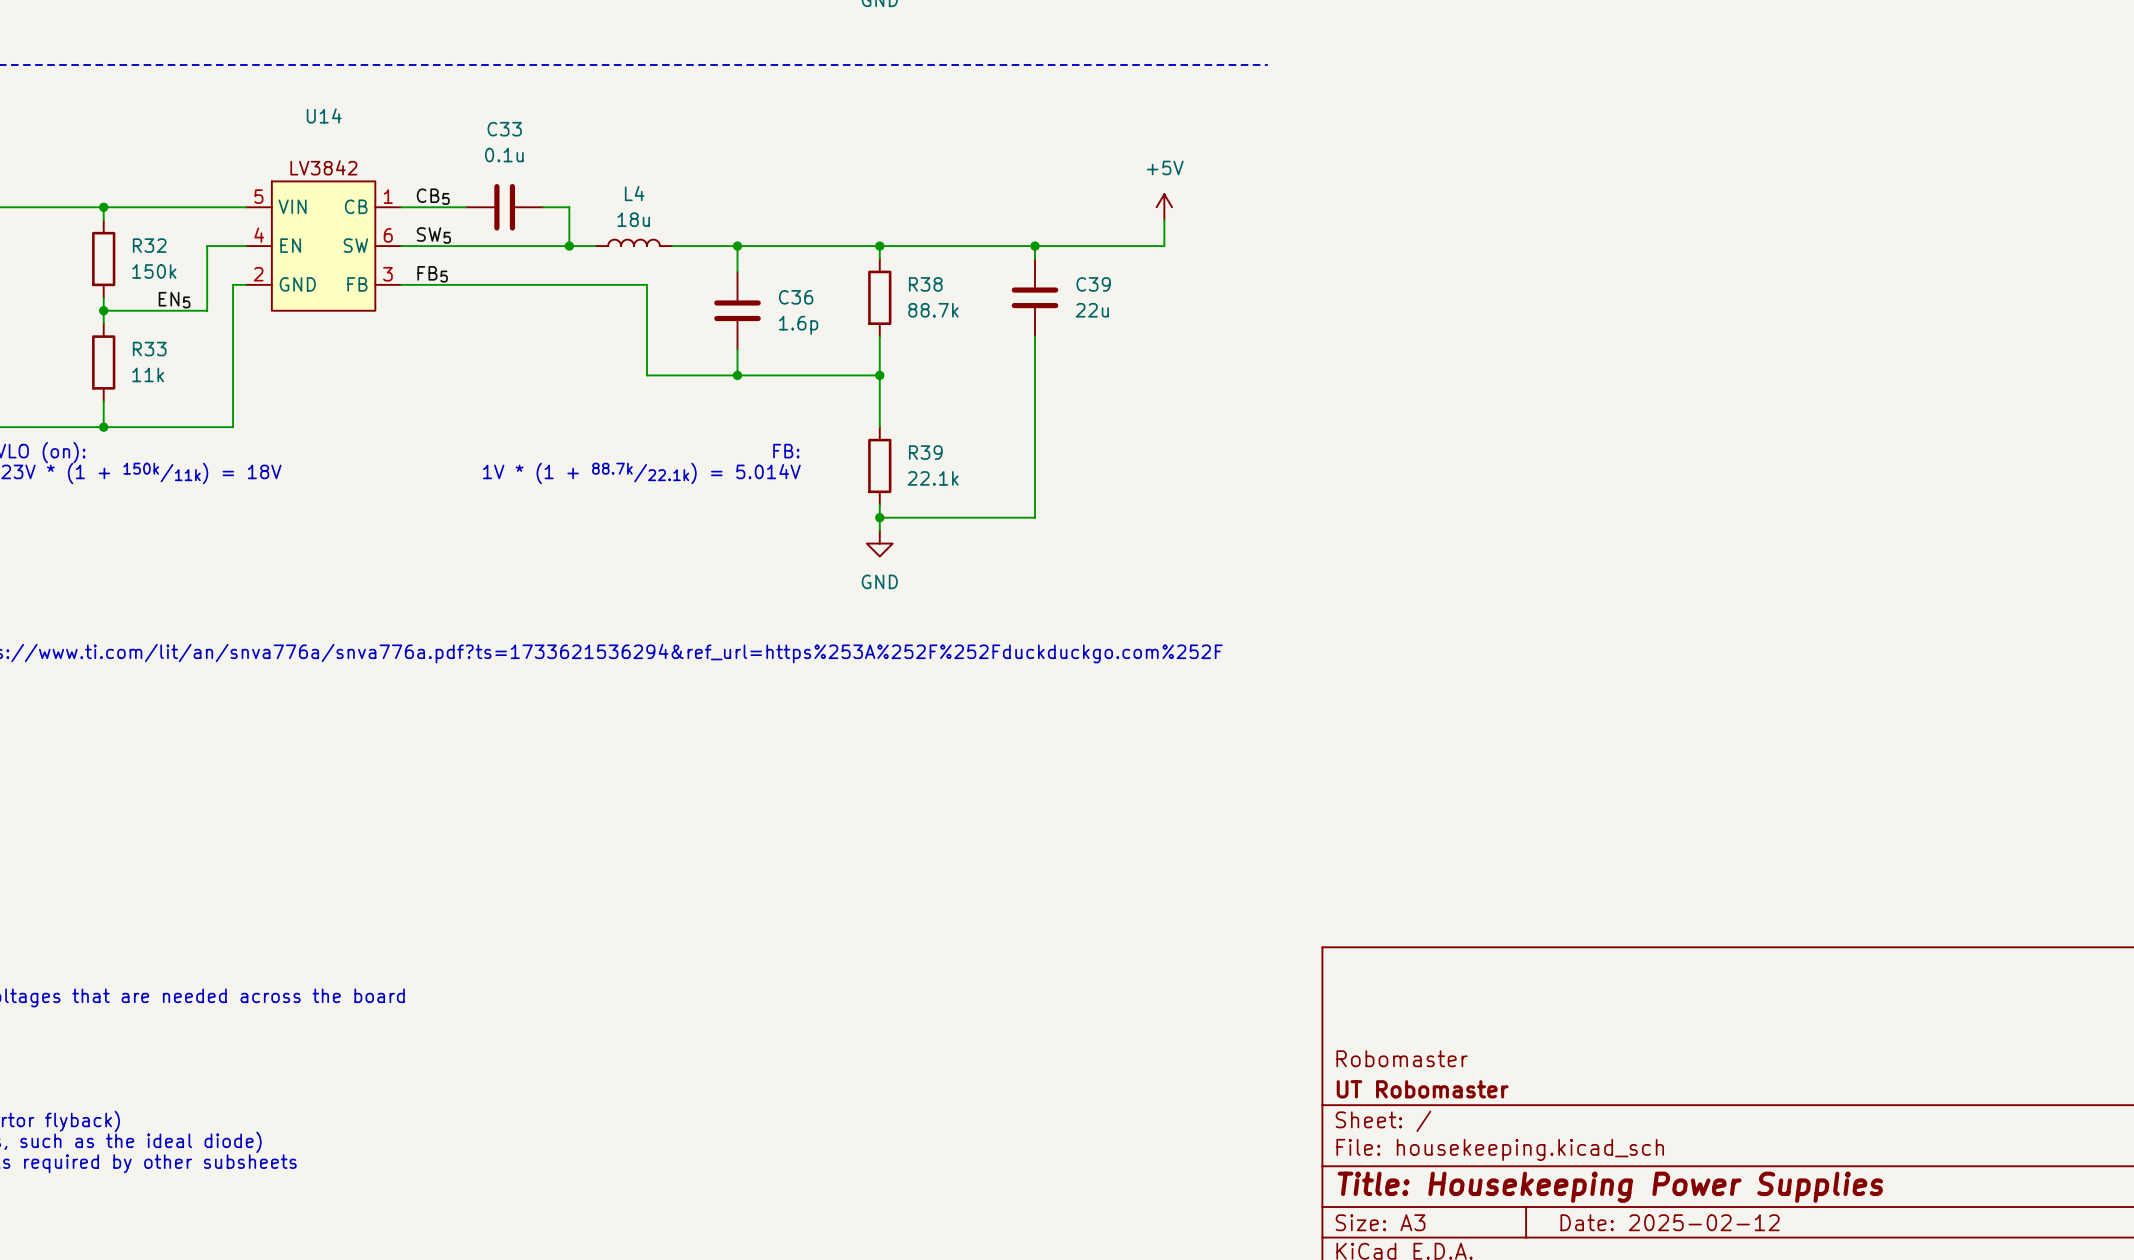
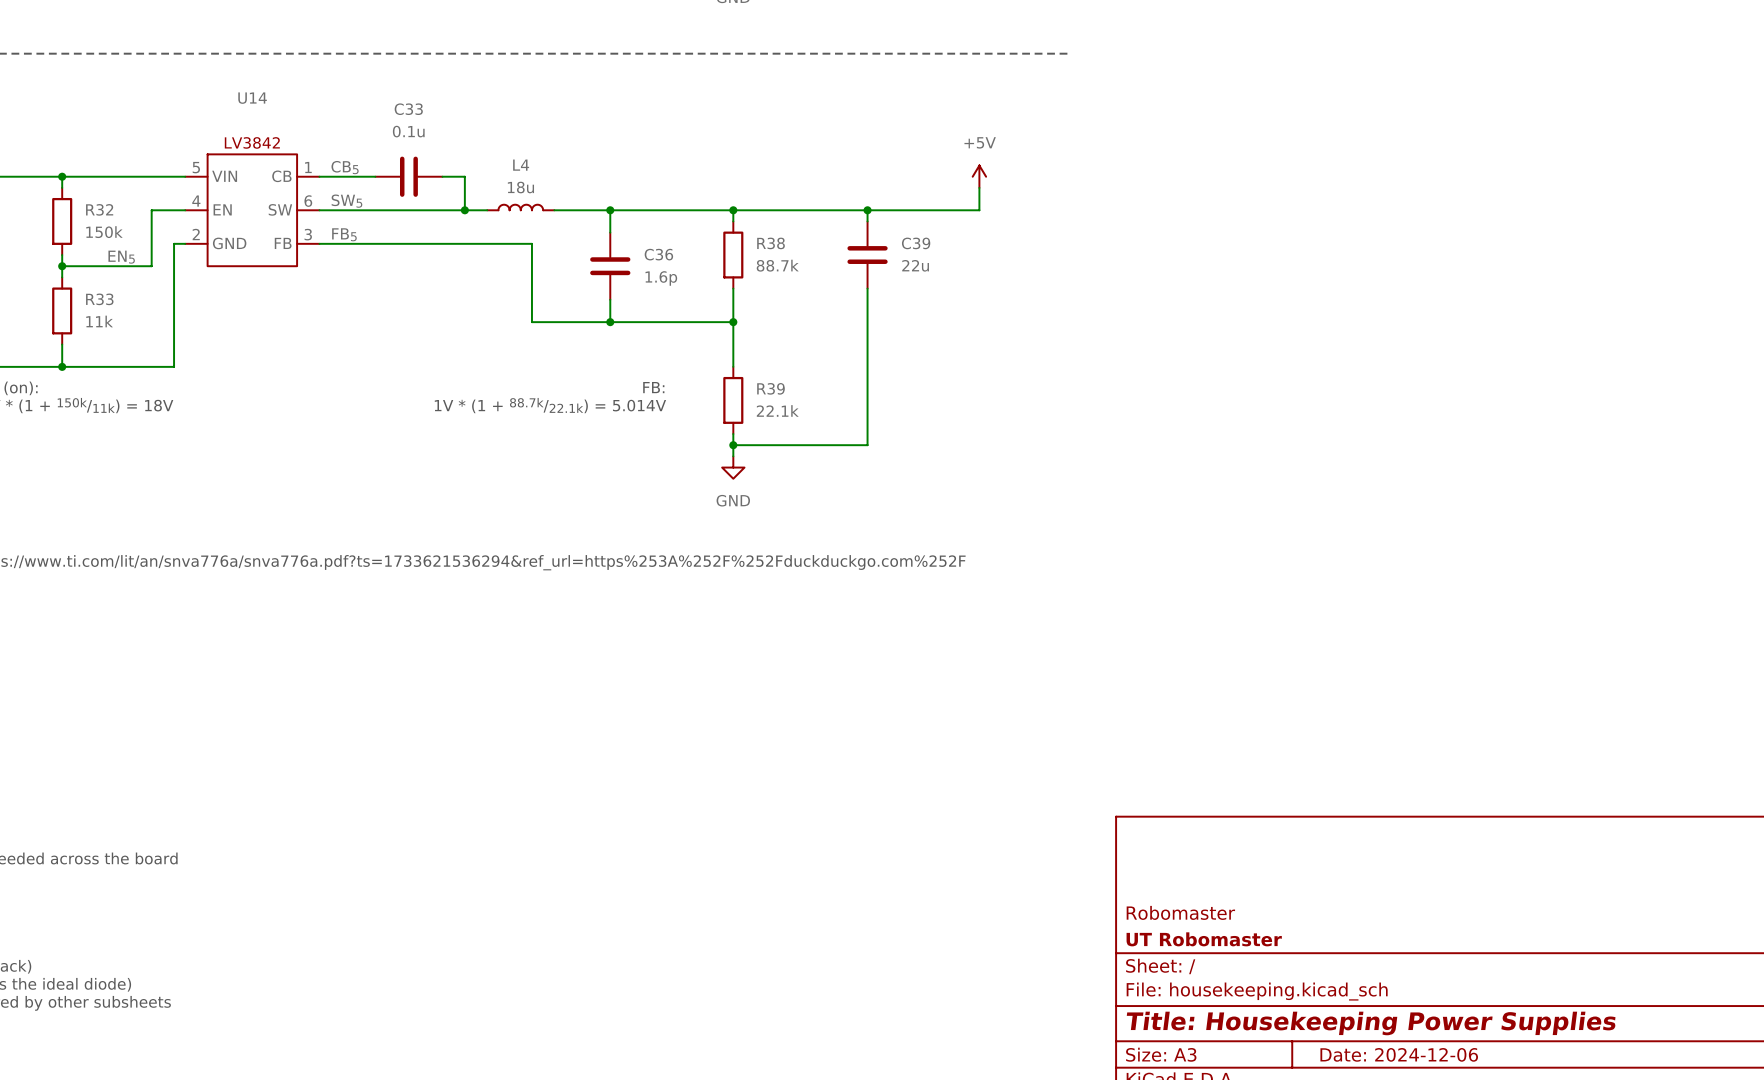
title block: Date: 2025-02-12 (1670, 1222) -> Date: 2024-12-06 (1399, 1054)

